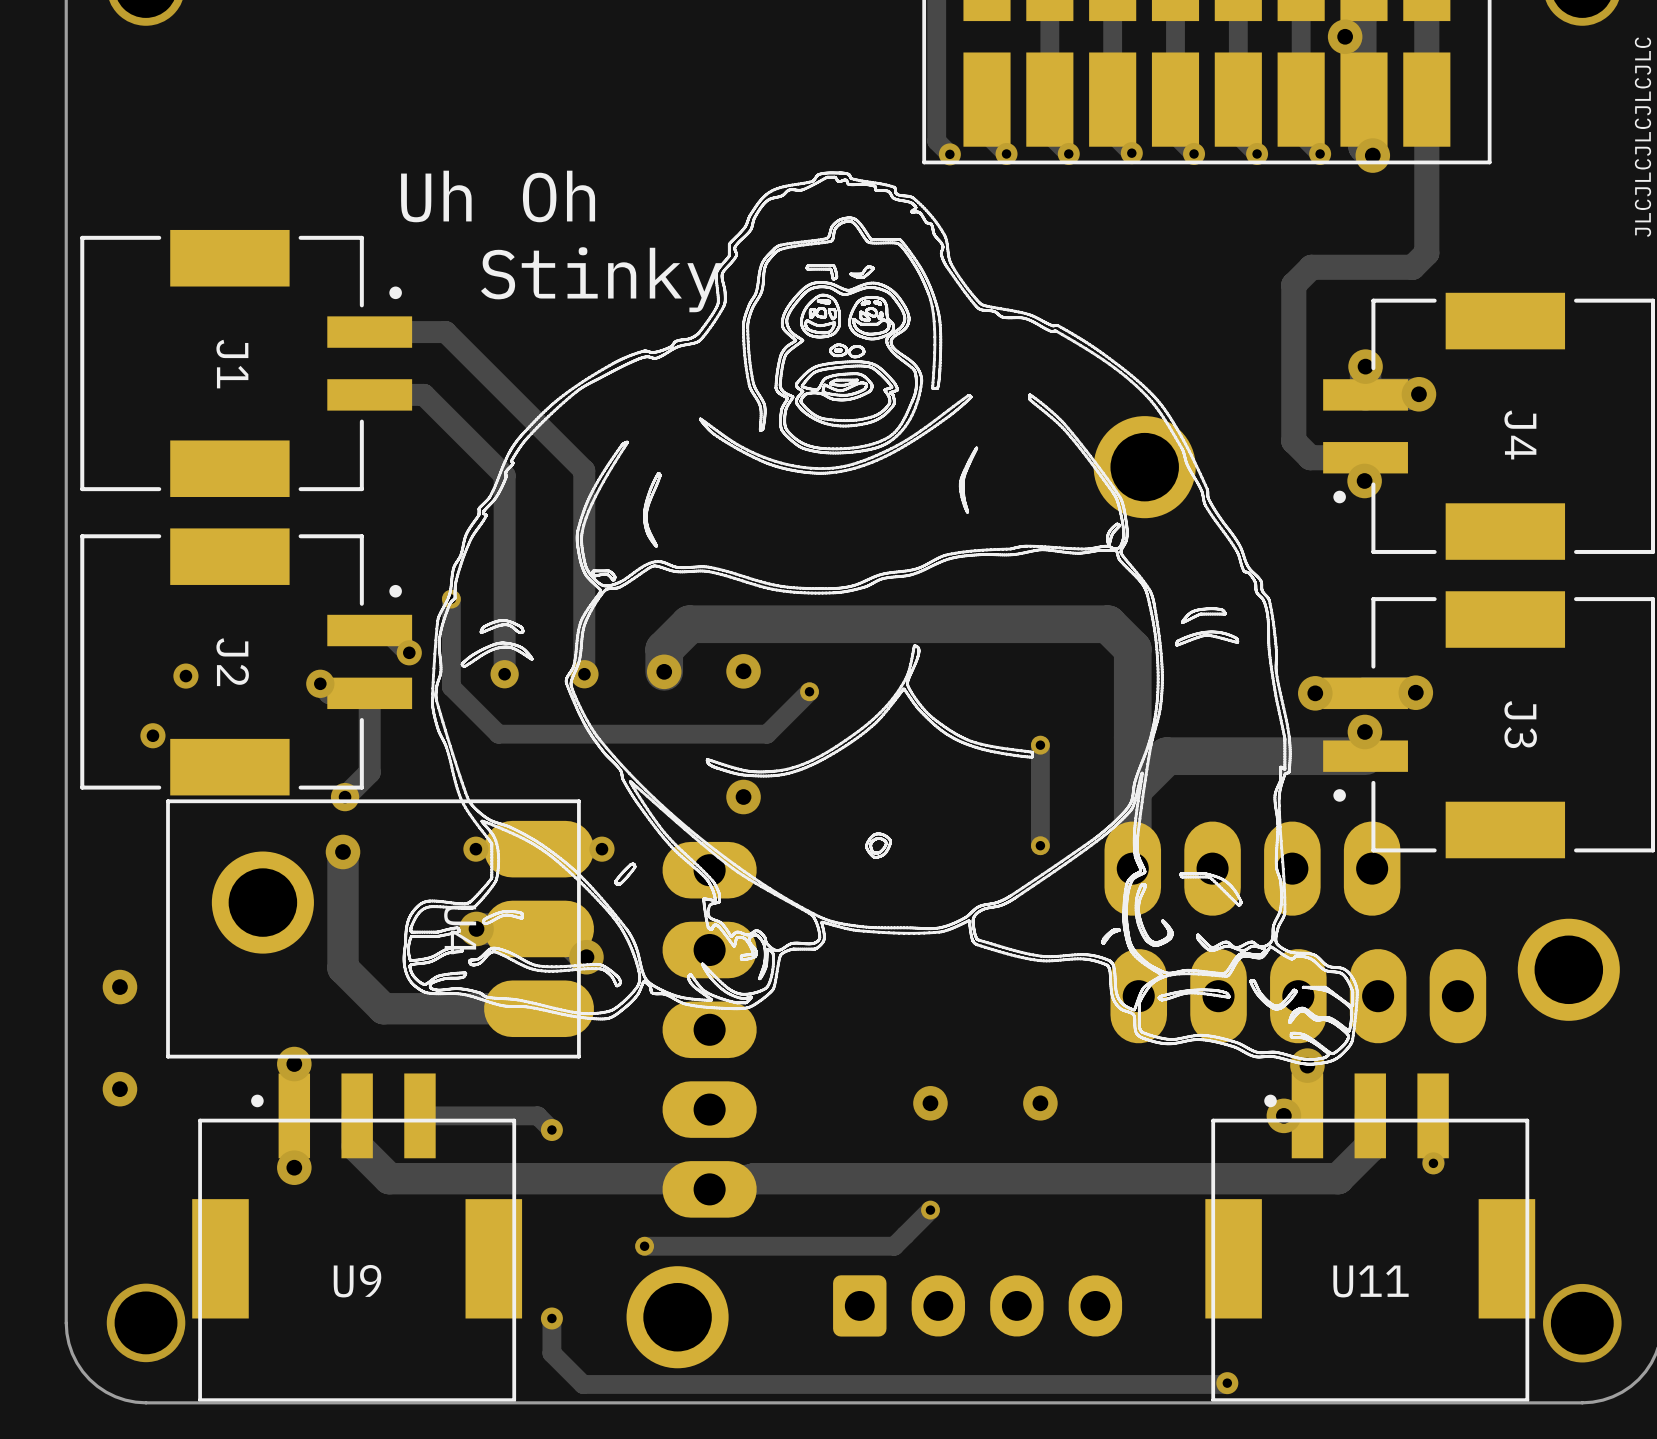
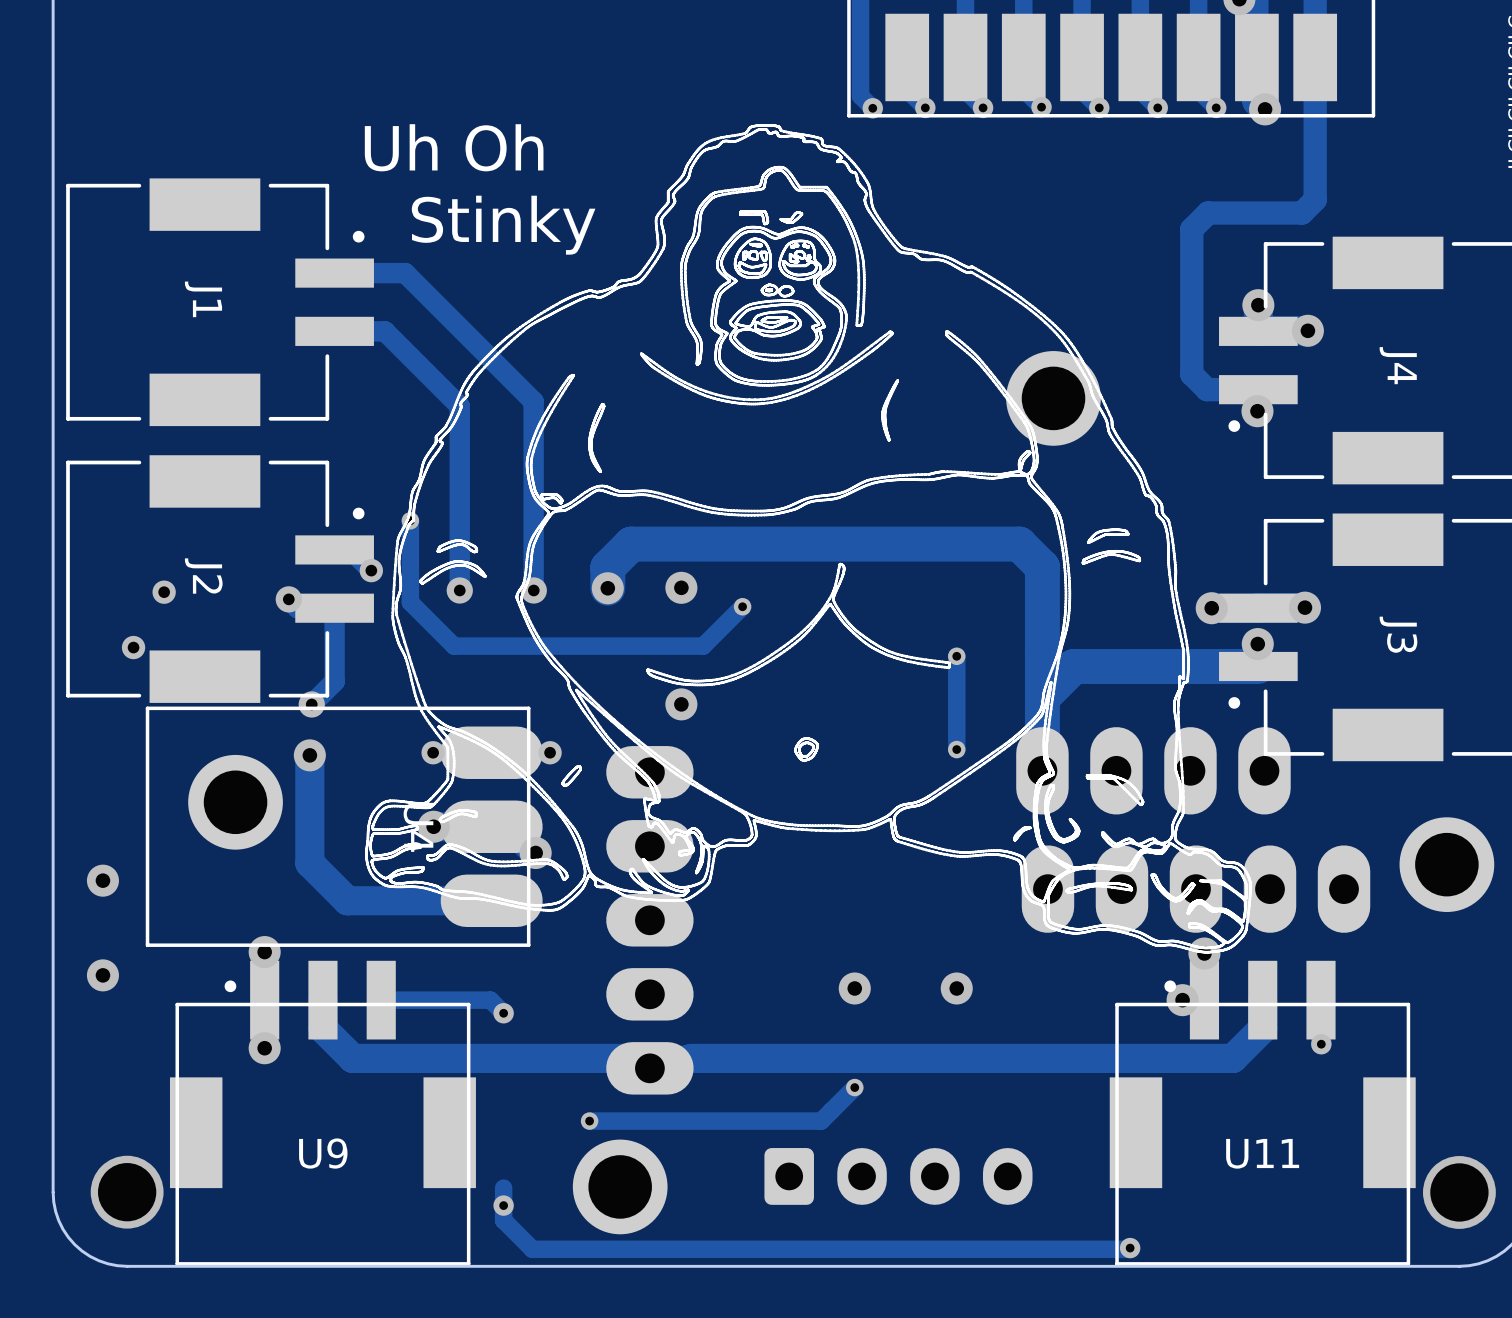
via position: (551, 1318) -> (503, 1205)

